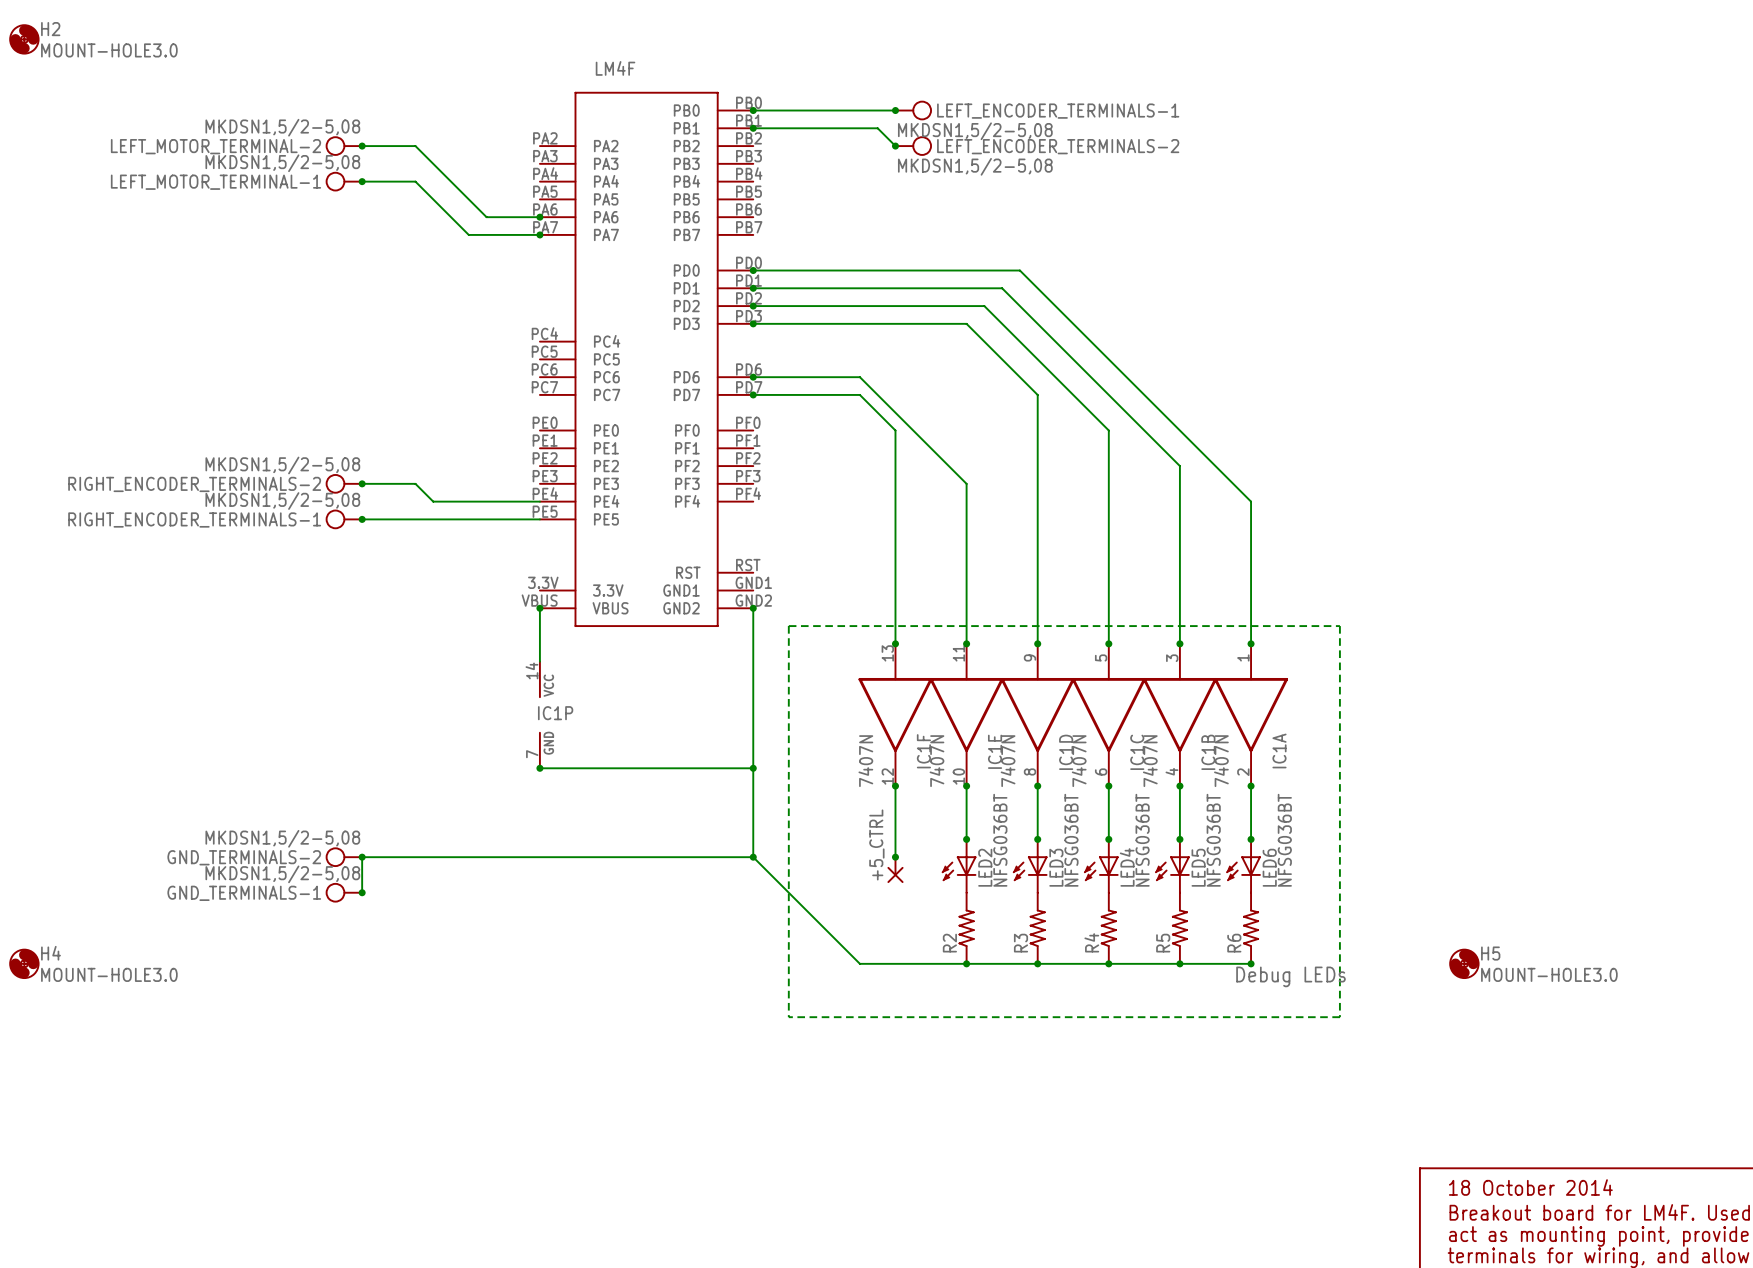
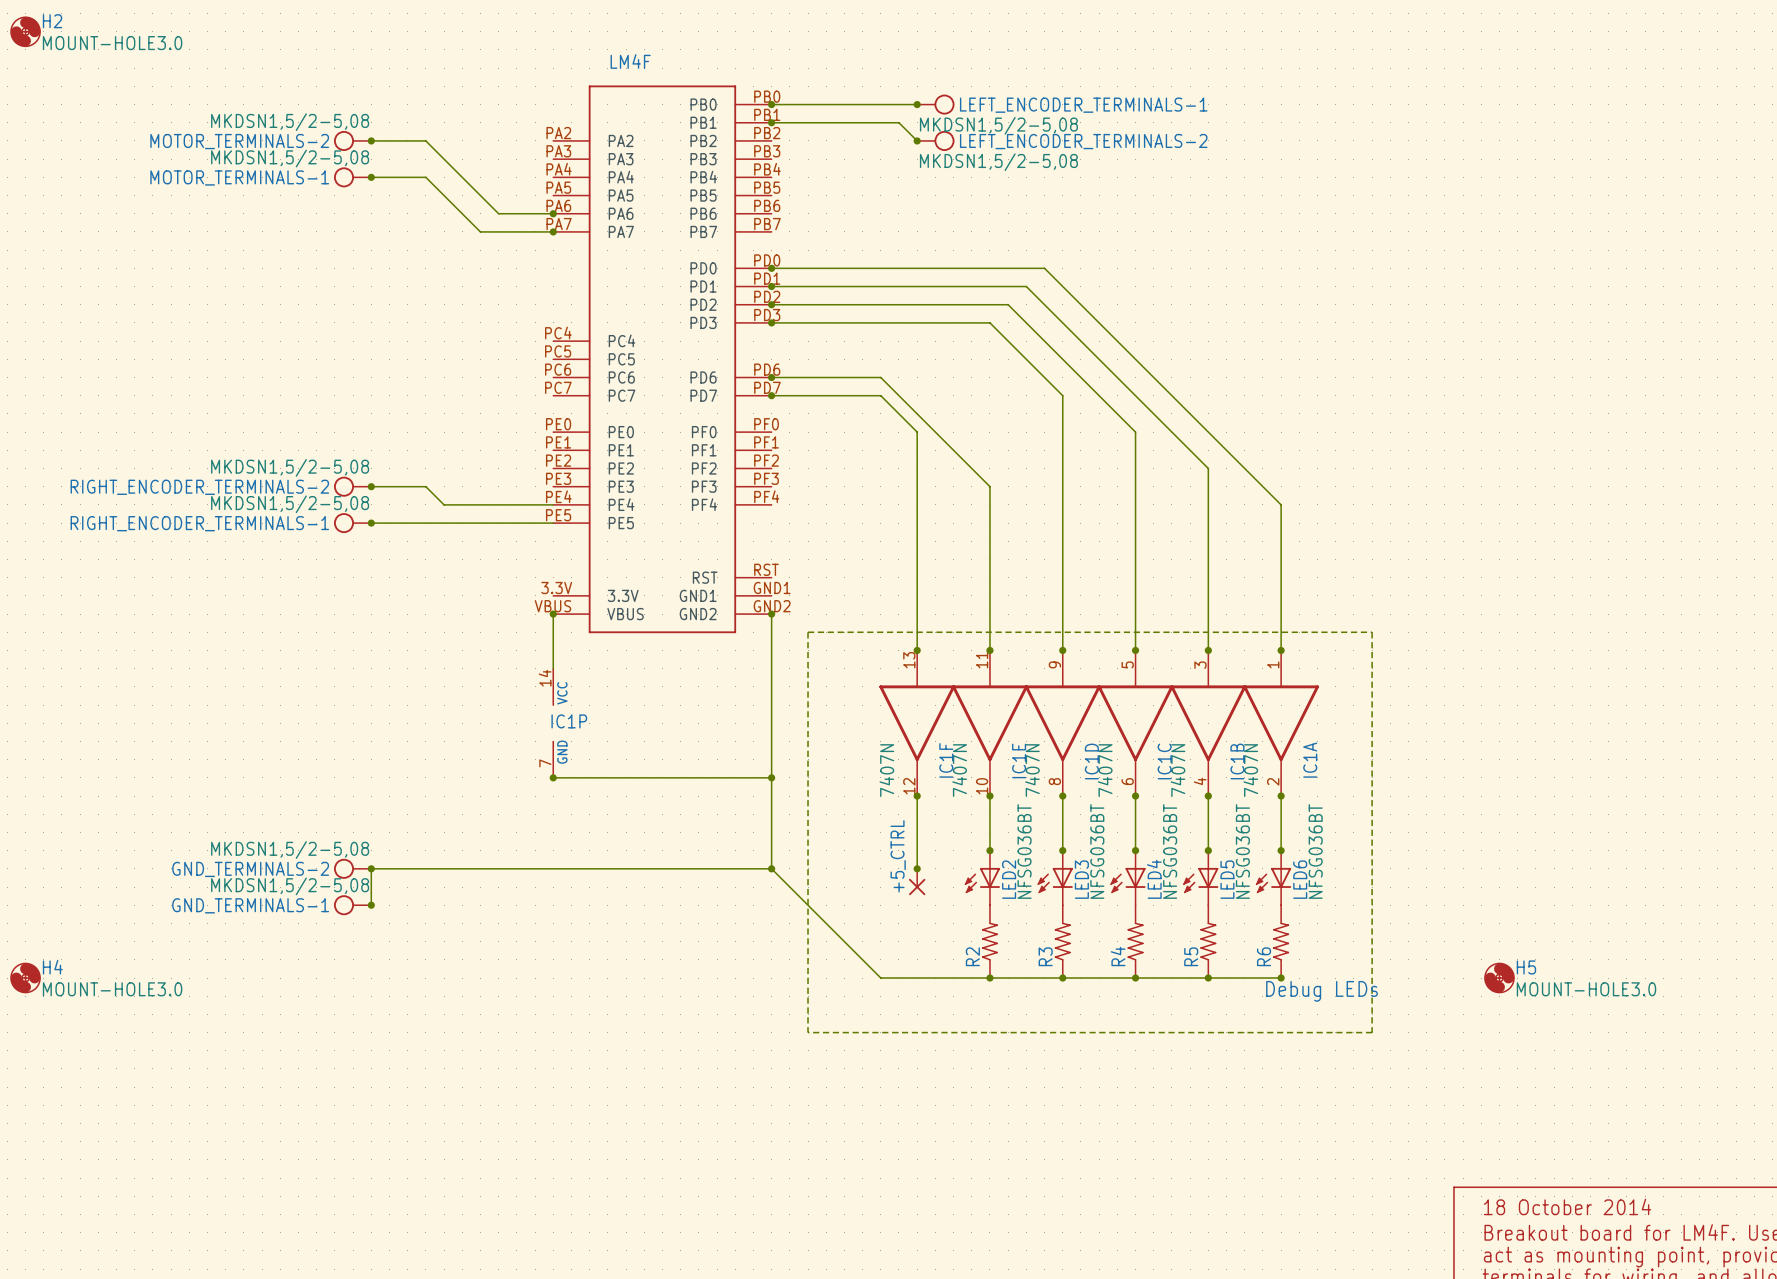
LEFT_MOTOR_TERMINAL-2 name: LEFT_MOTOR_TERMINAL-2 (215, 146) -> MOTOR_TERMINALS-2 (239, 141)
LEFT_MOTOR_TERMINAL-1 name: LEFT_MOTOR_TERMINAL-1 (215, 182) -> MOTOR_TERMINALS-1 (239, 177)

